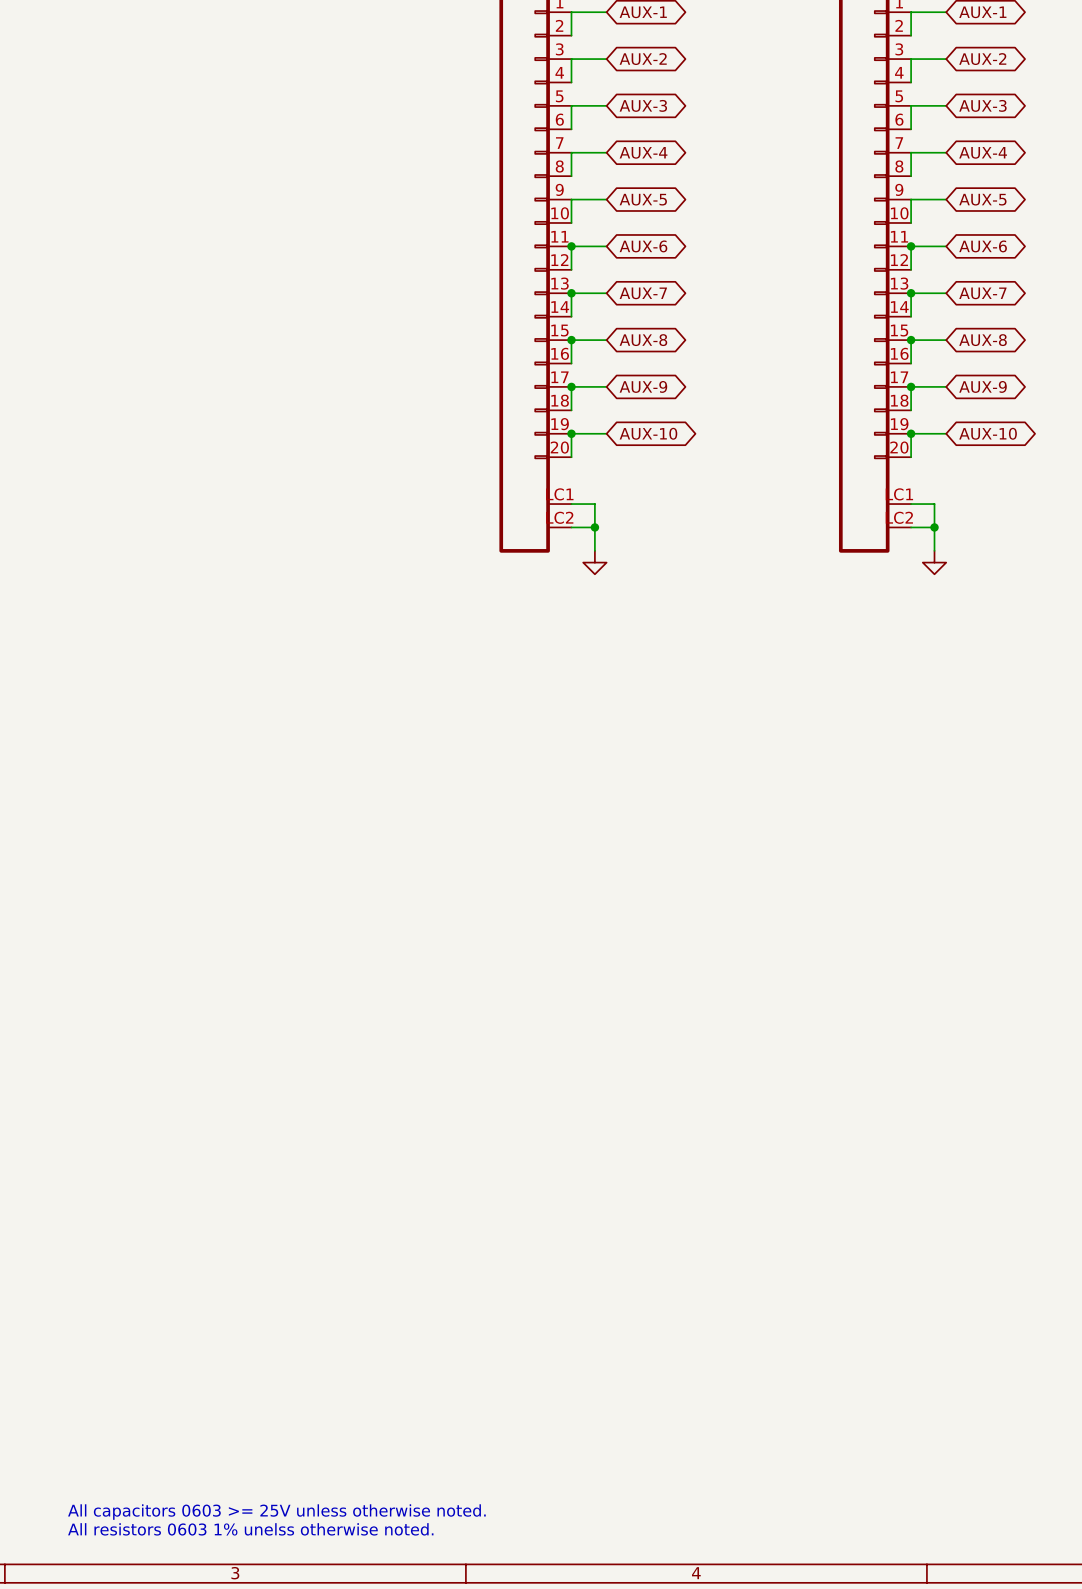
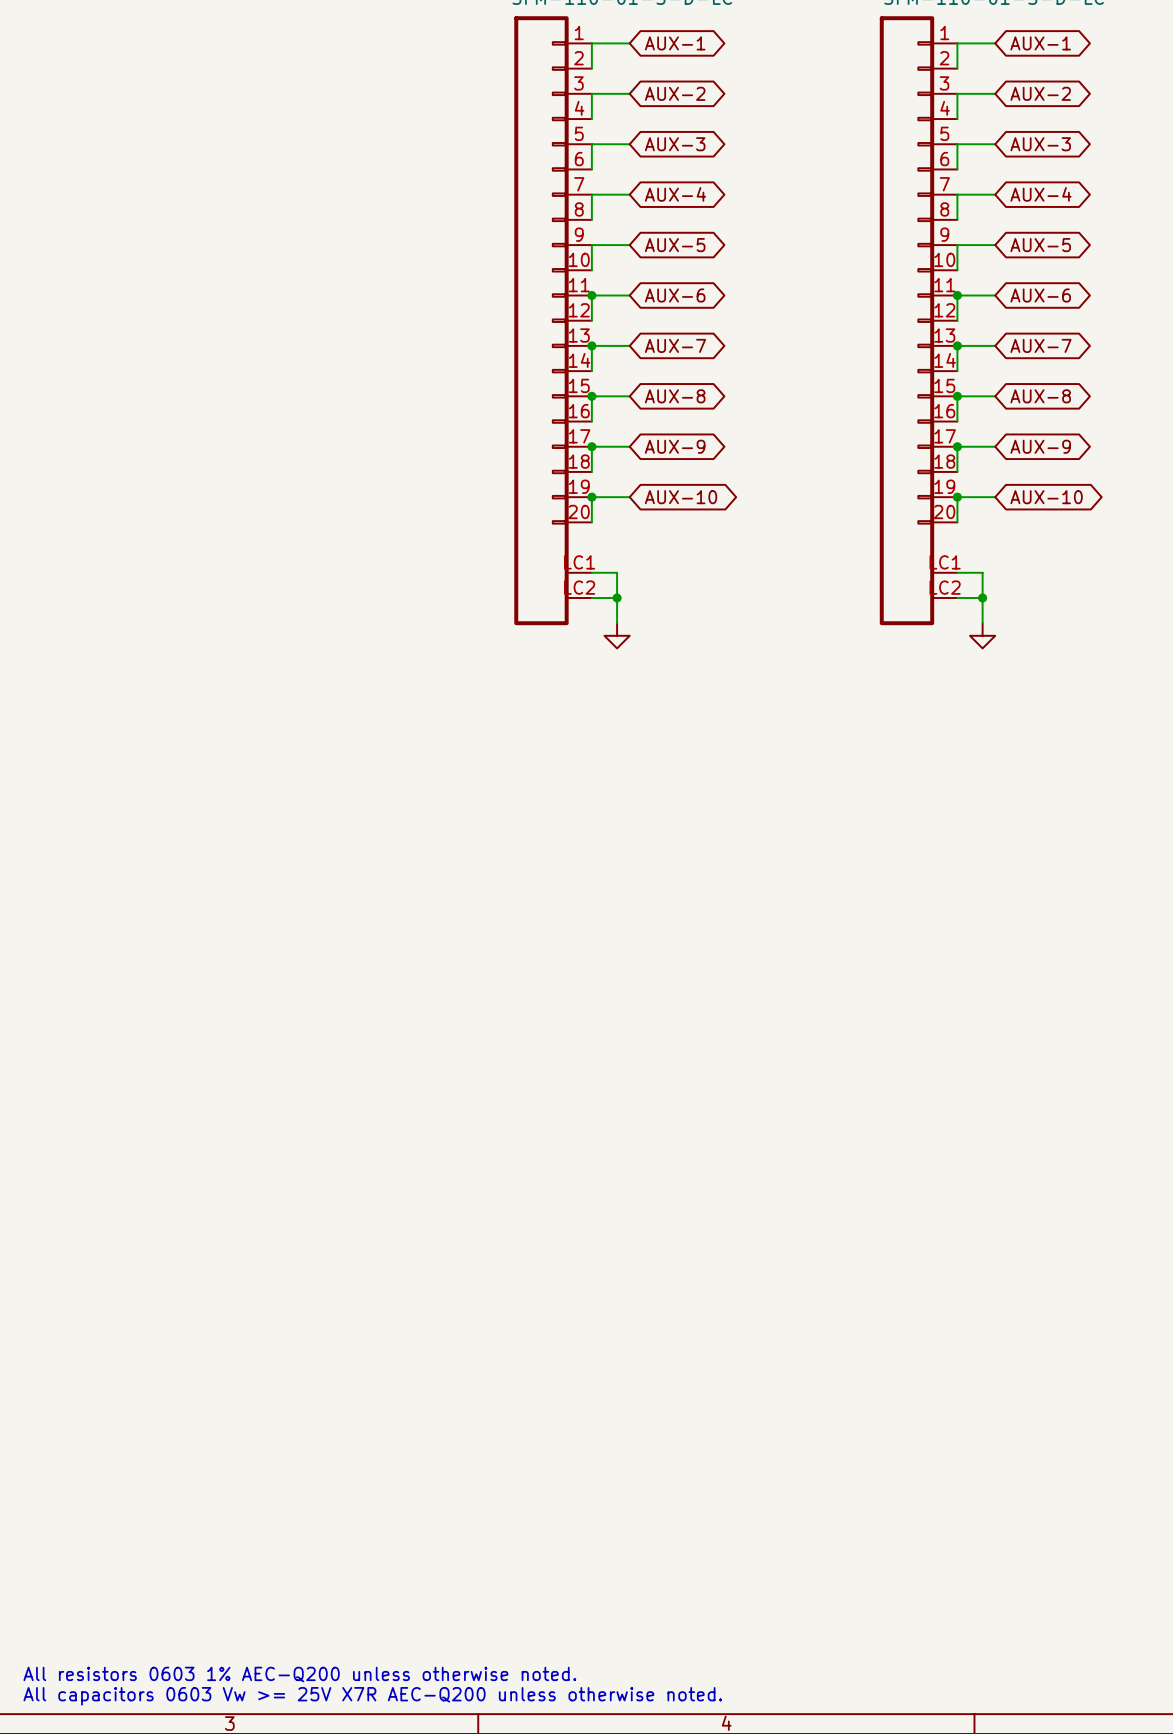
text: All capacitors 0603 >= 25V unless otherwise noted. (276, 1512) -> none
text: none -> All resistors 0603 1% AEC-Q200 unless otherwise noted. (299, 1674)
text: All resistors 0603 1% unelss otherwise noted. (250, 1529) -> none
text: none -> All capacitors 0603 Vw >= 25V X7R AEC-Q200 unless otherwise noted. (372, 1696)

